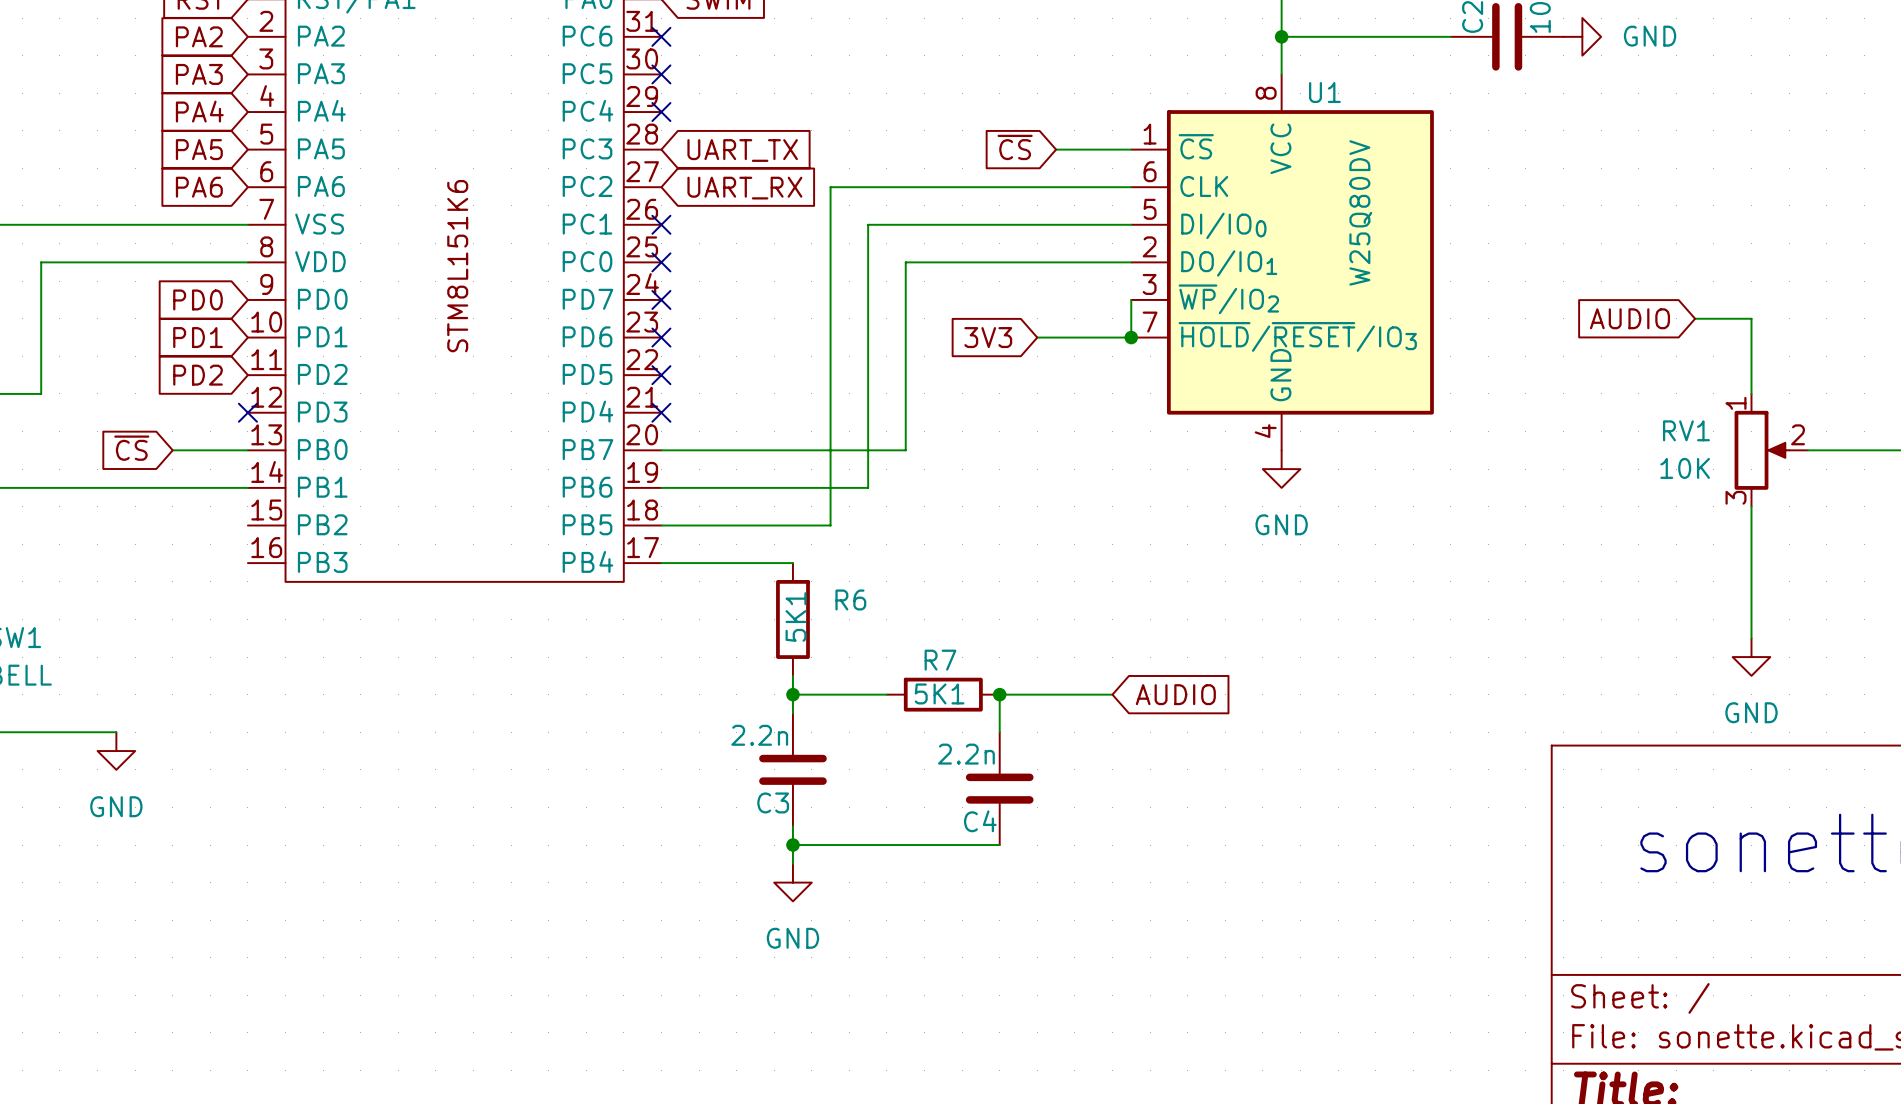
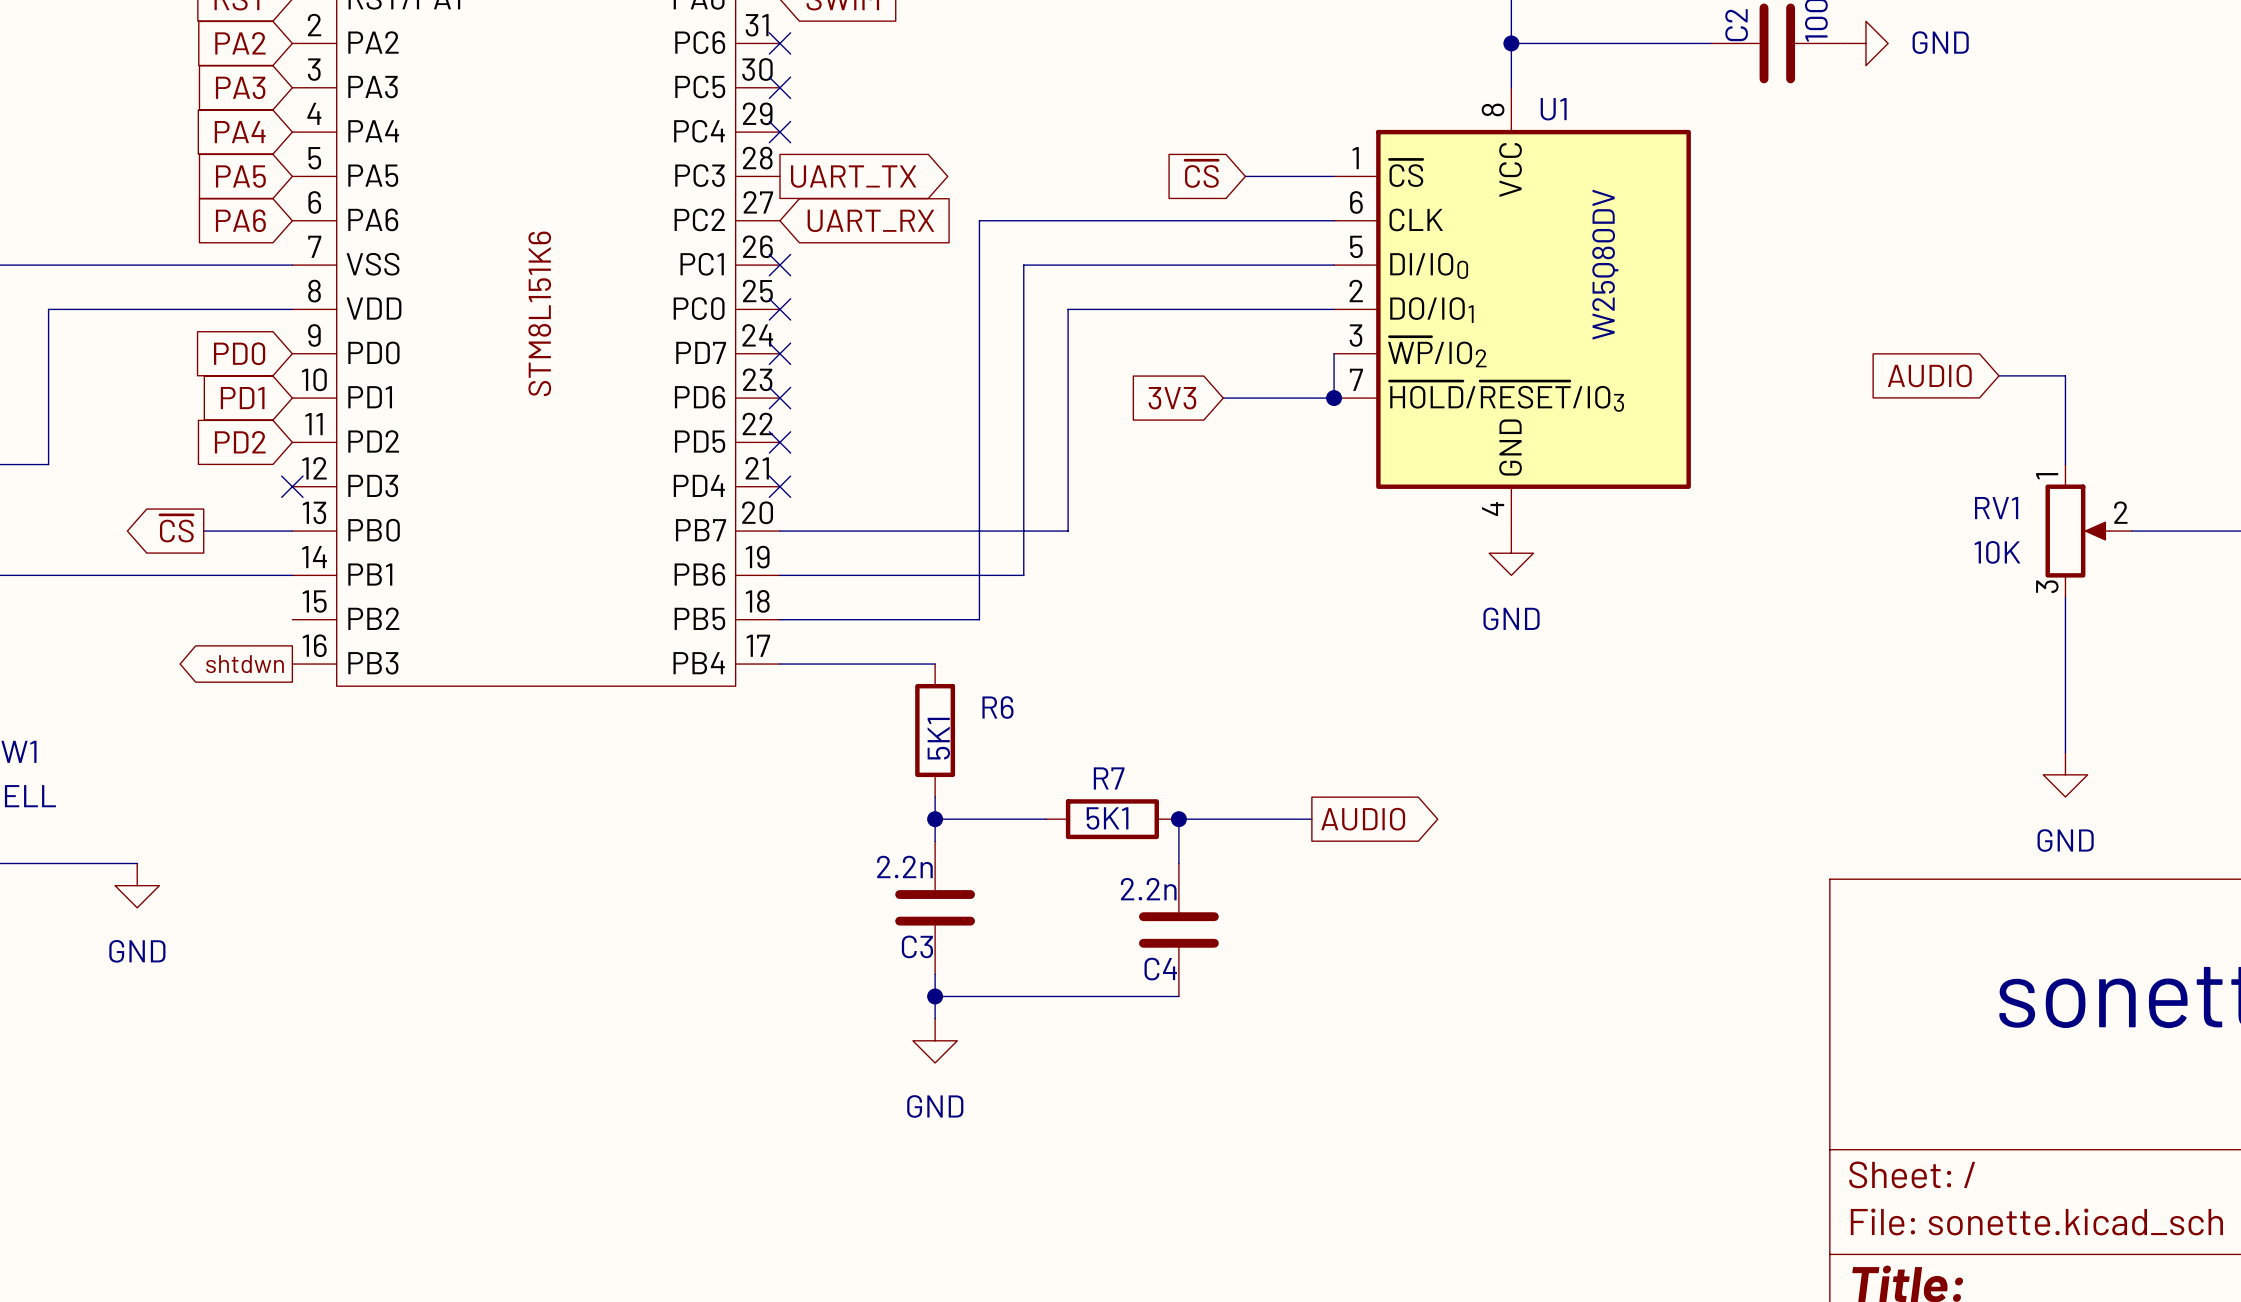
global label shape: input (742, 150) -> output (853, 176)
global label shape: input (131, 448) -> output (176, 528)
global label: none -> shtdwn (245, 664)
global label shape: input (1175, 694) -> output (1363, 819)

